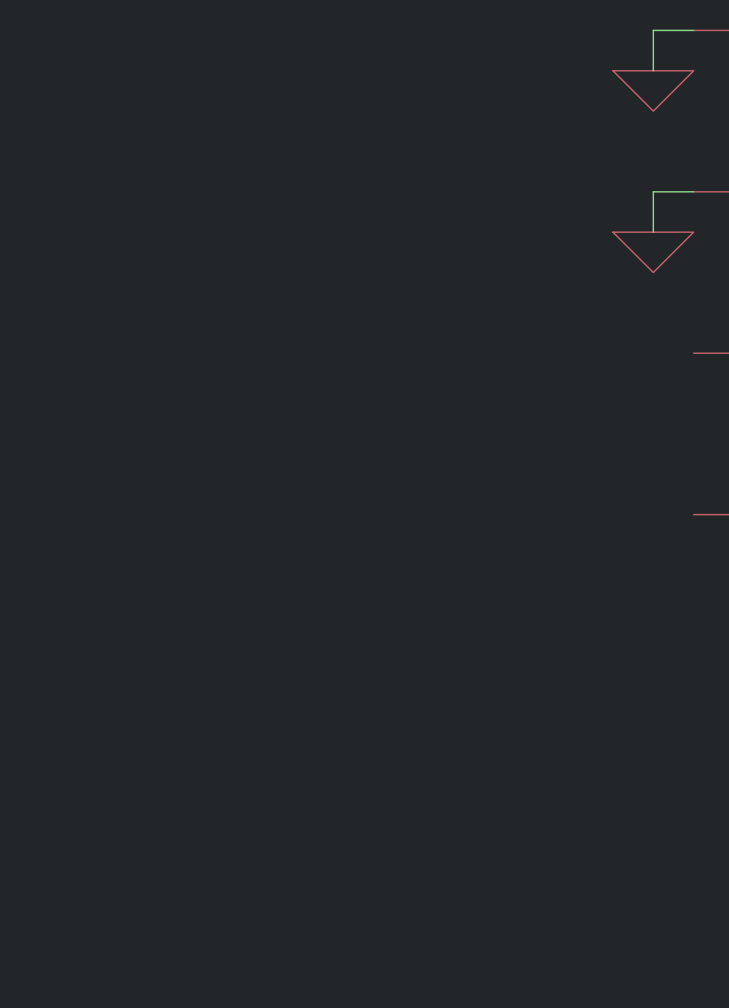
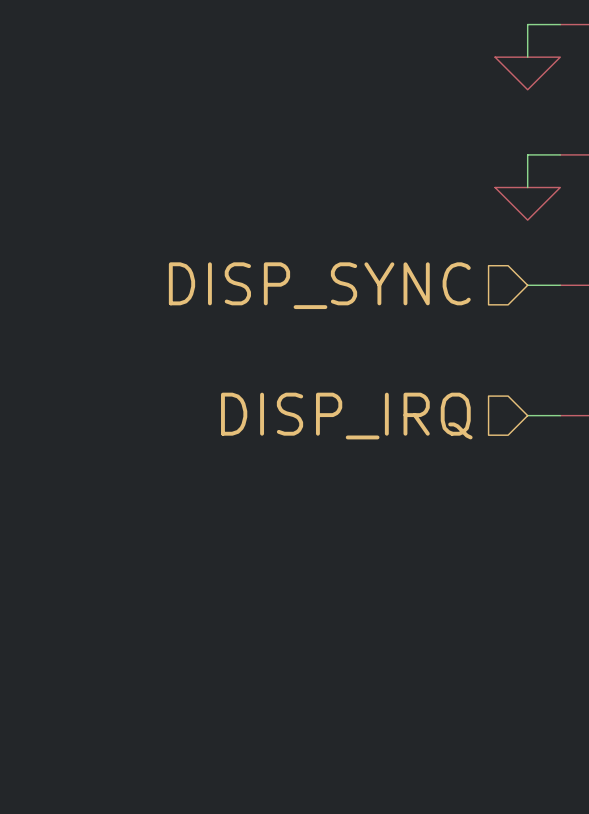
hierarchical label: none -> DISP_SYNC (319, 285)
wire: none -> (527, 285) (560, 285)
wire: none -> (527, 415) (560, 415)
hierarchical label: none -> DISP_IRQ (346, 416)

